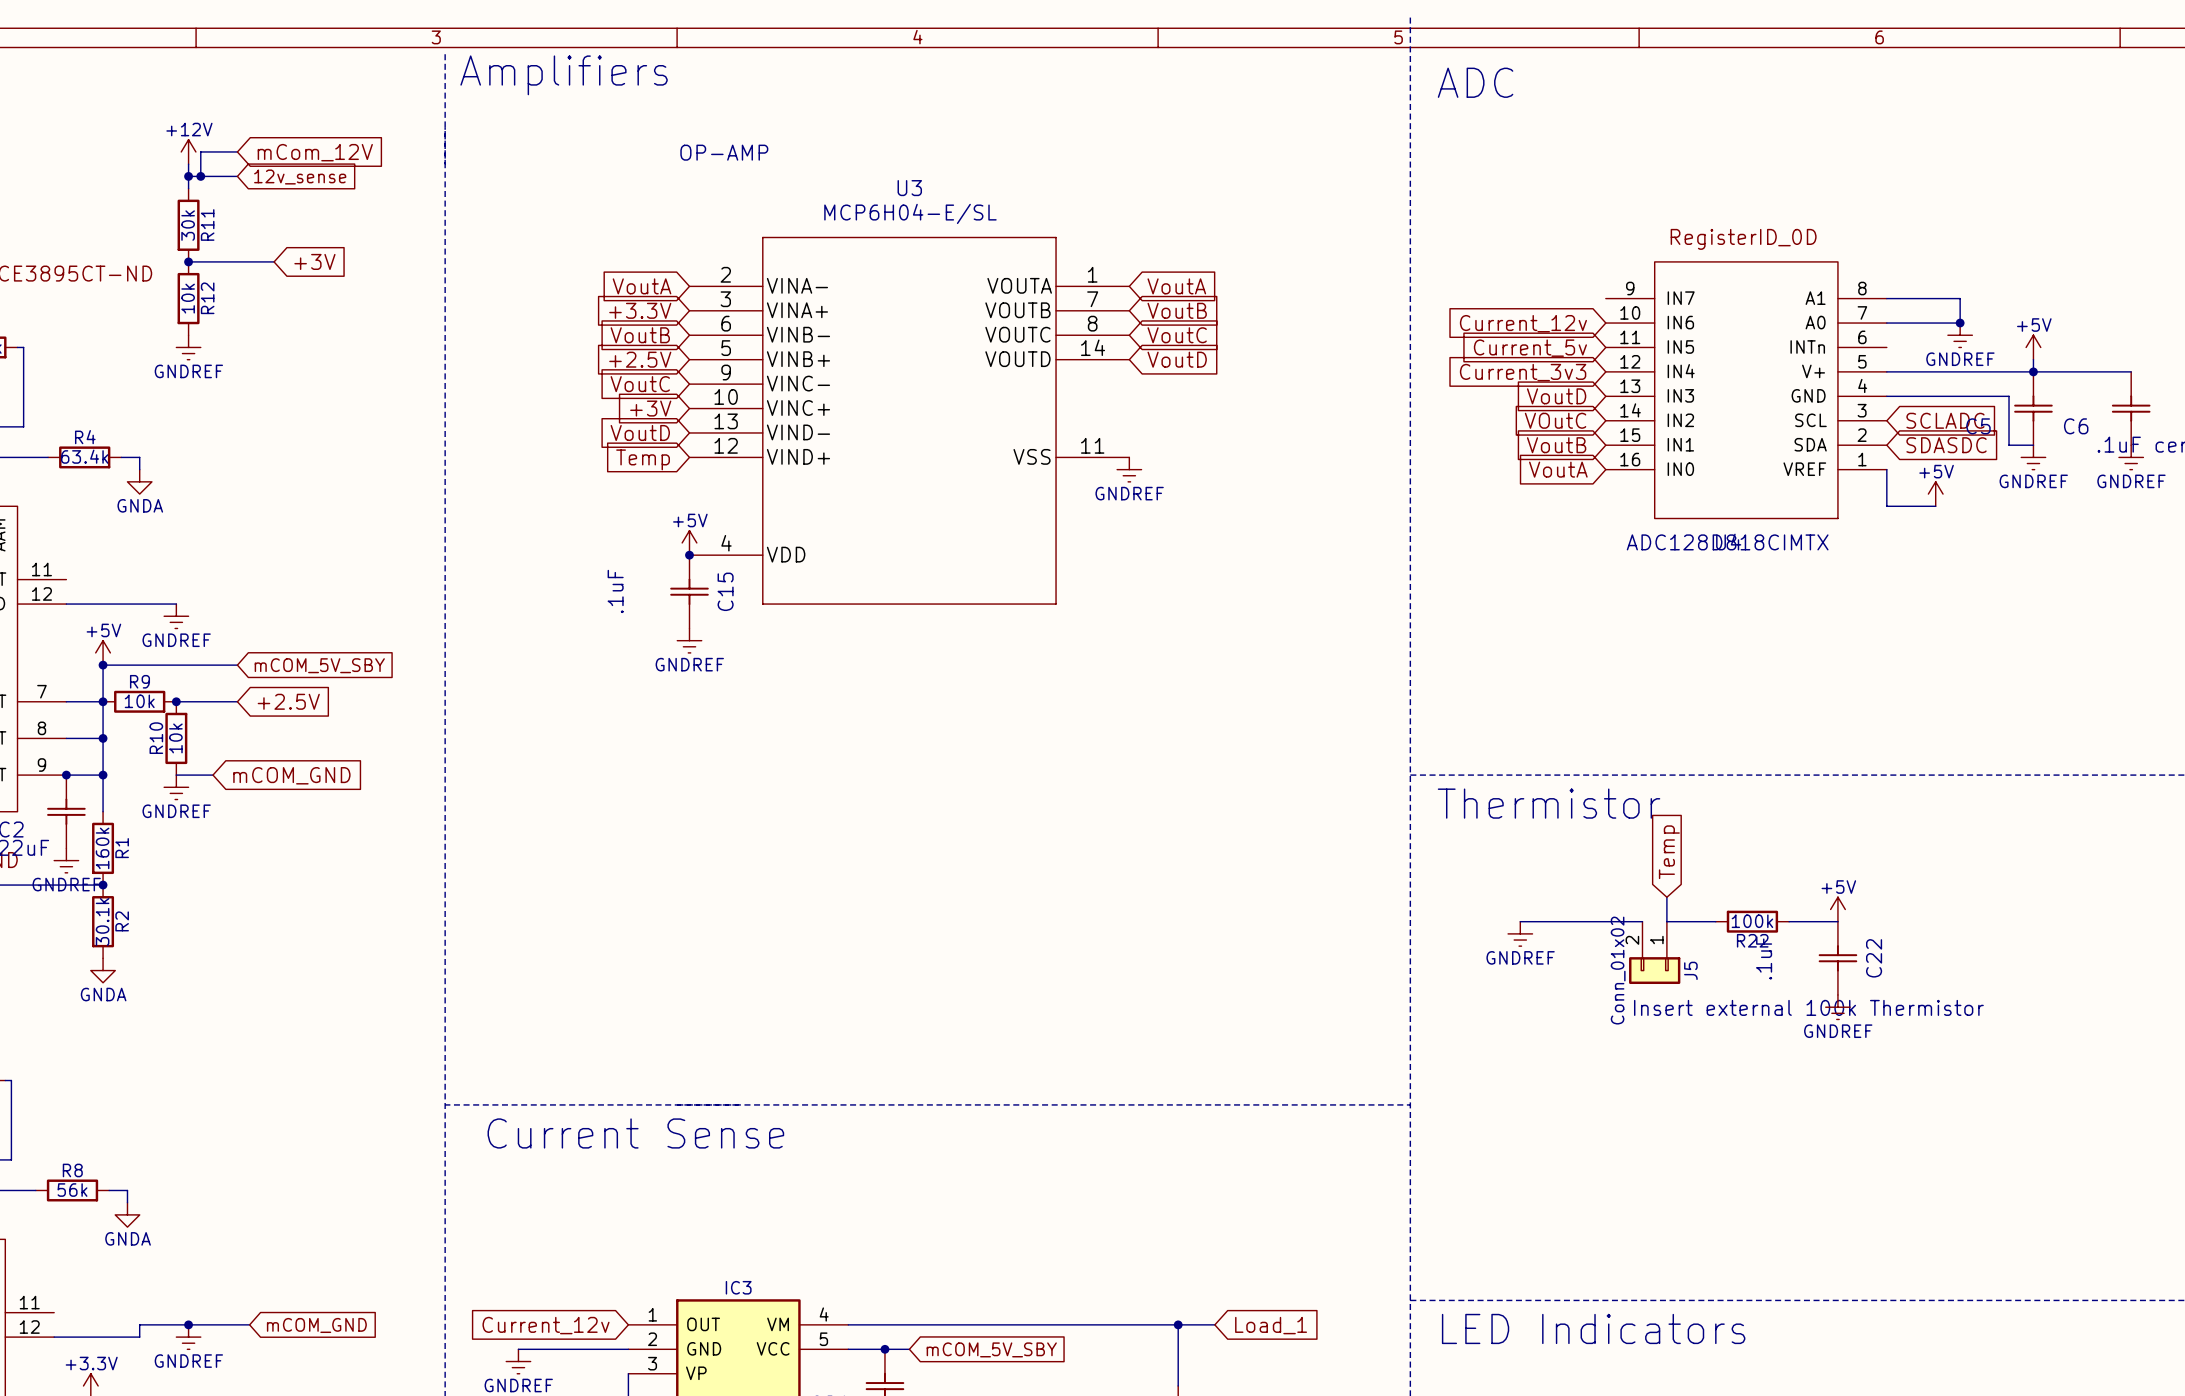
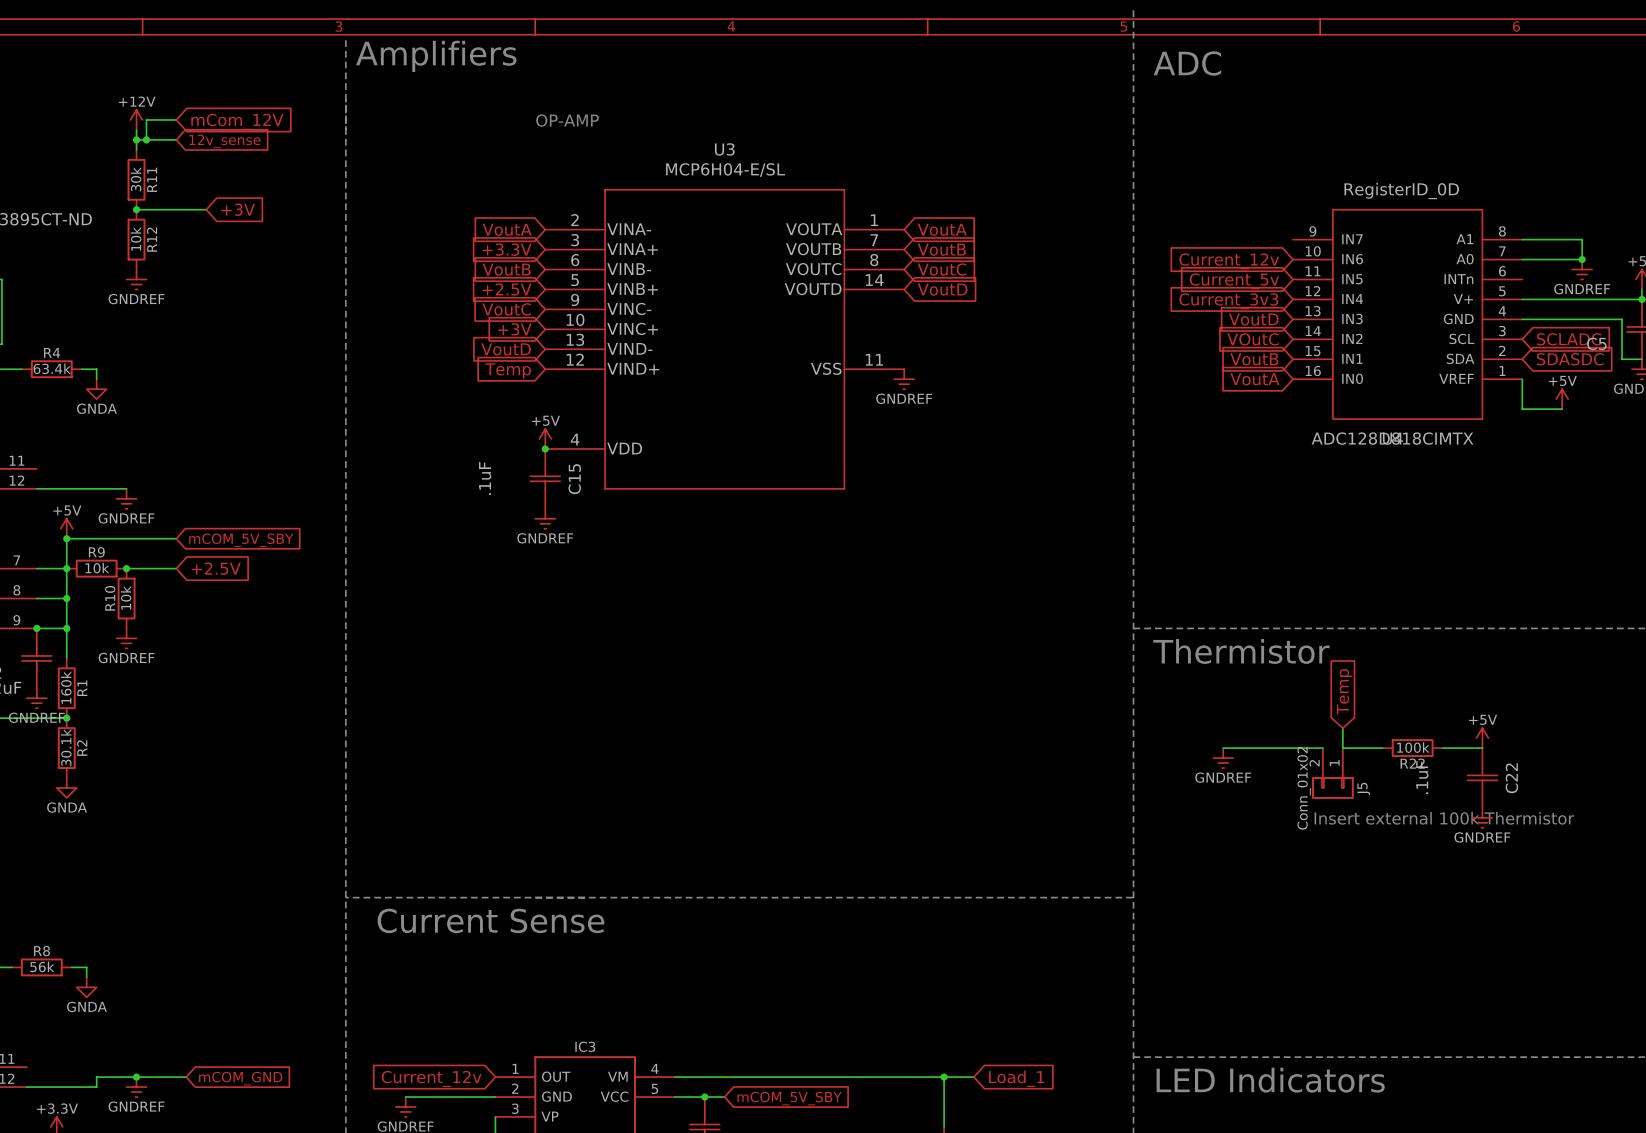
wire: (176, 775) (213, 775) -> none
global label: mCOM_GND (291, 775) -> none

